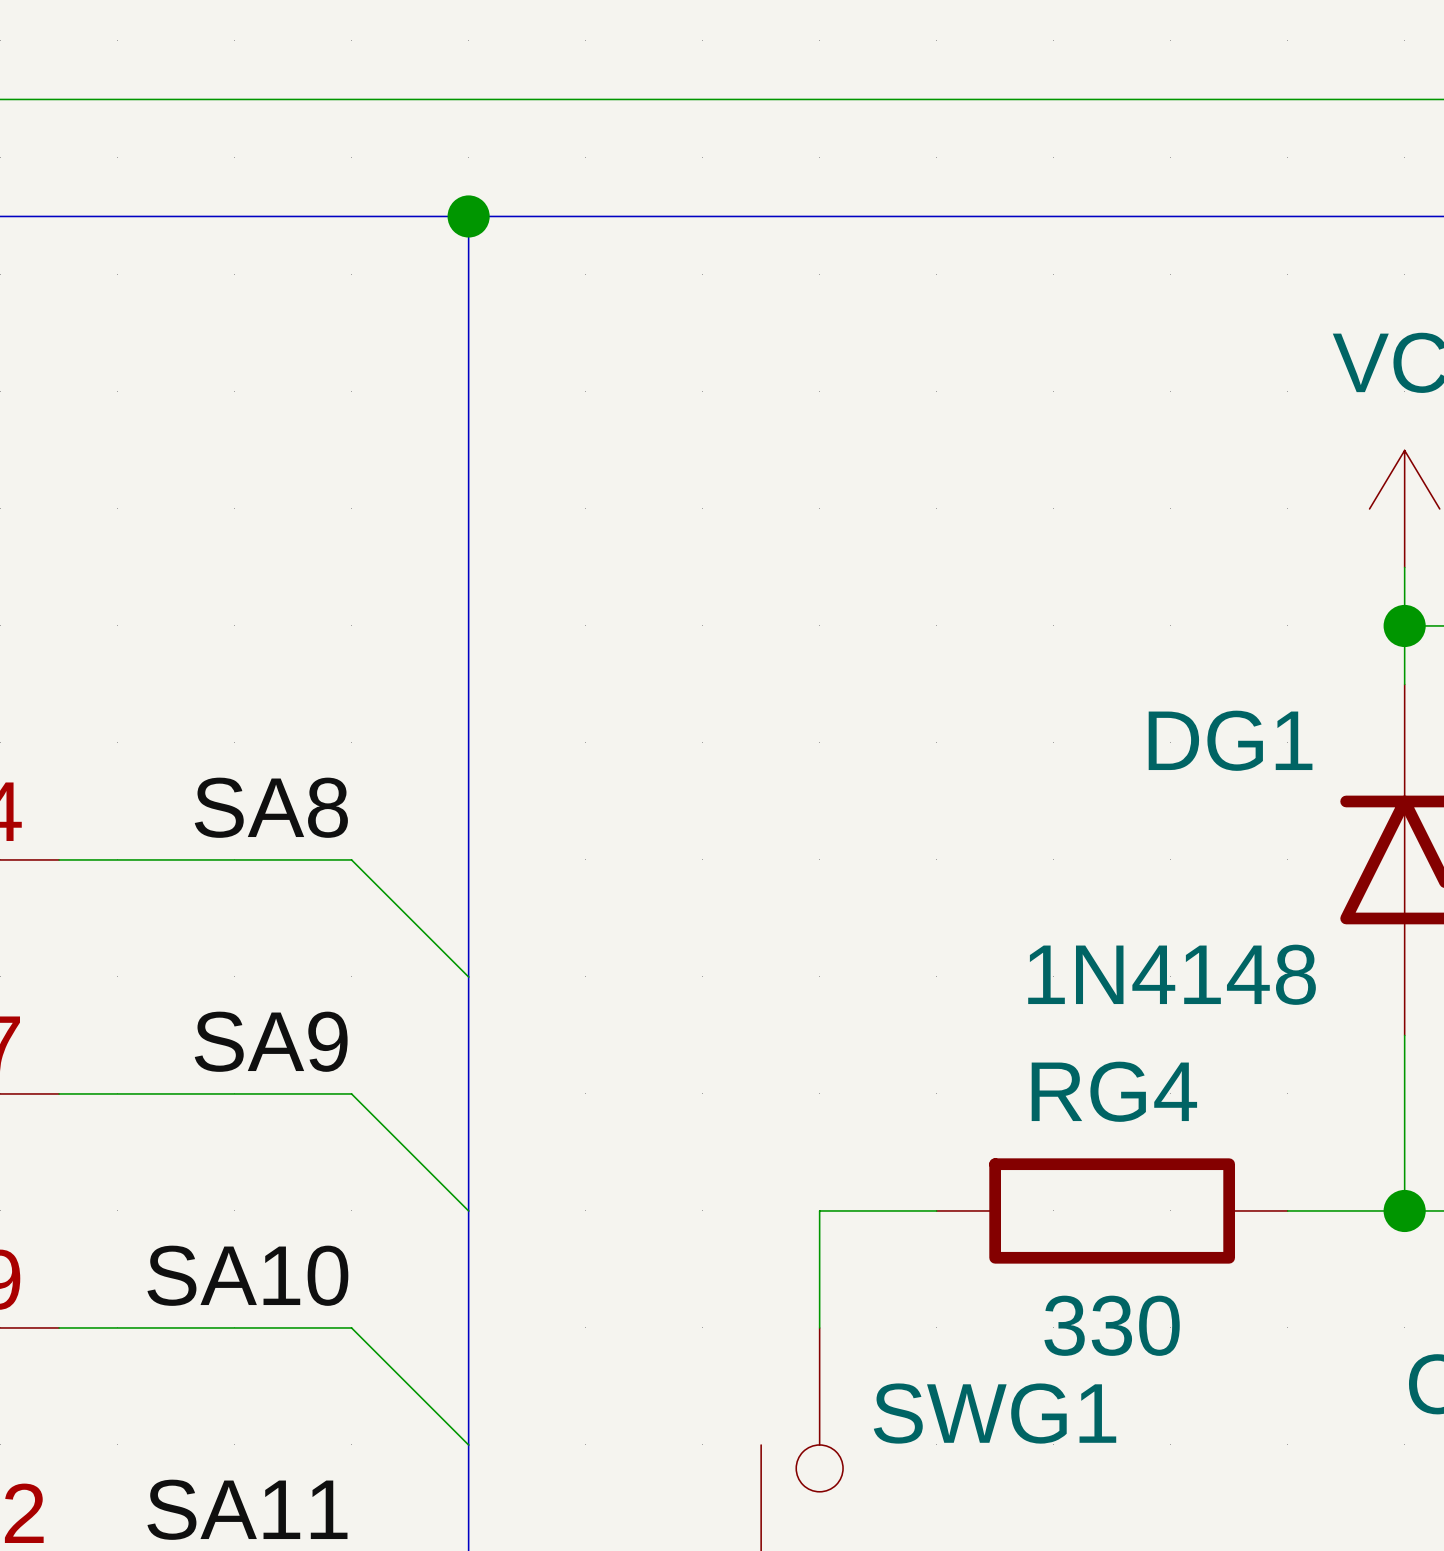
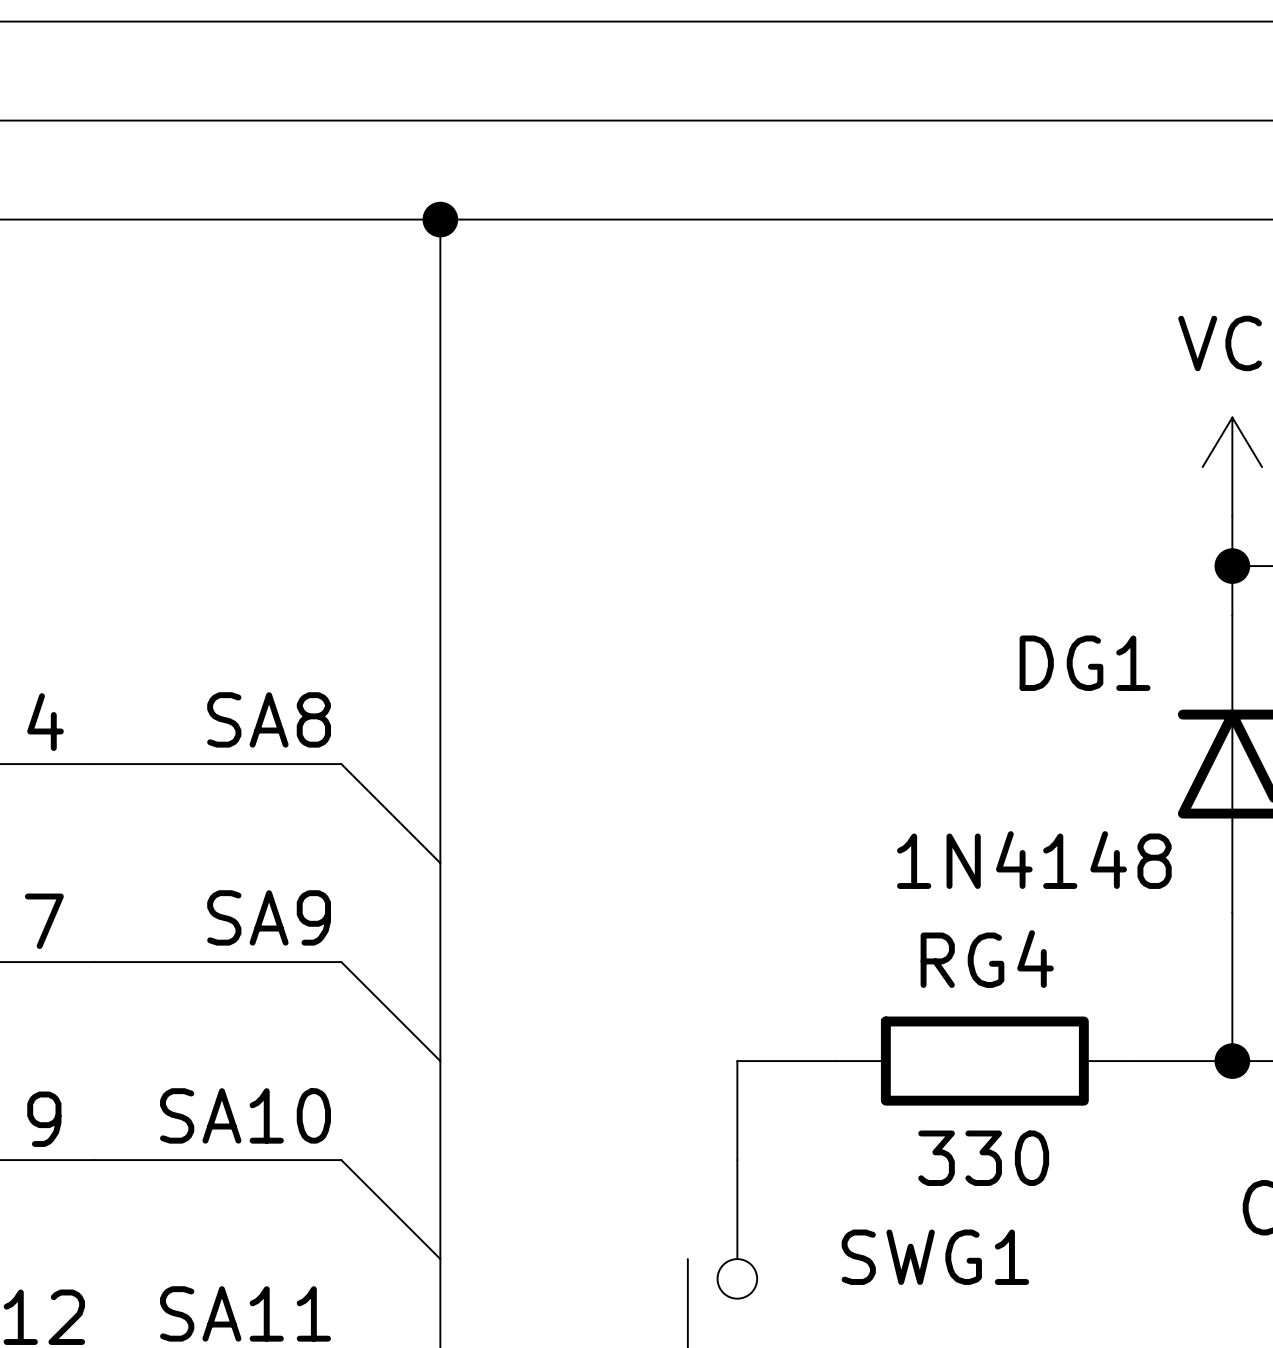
SWG1 name position: SWG1 (995, 1413) -> SWG1 (935, 1257)

